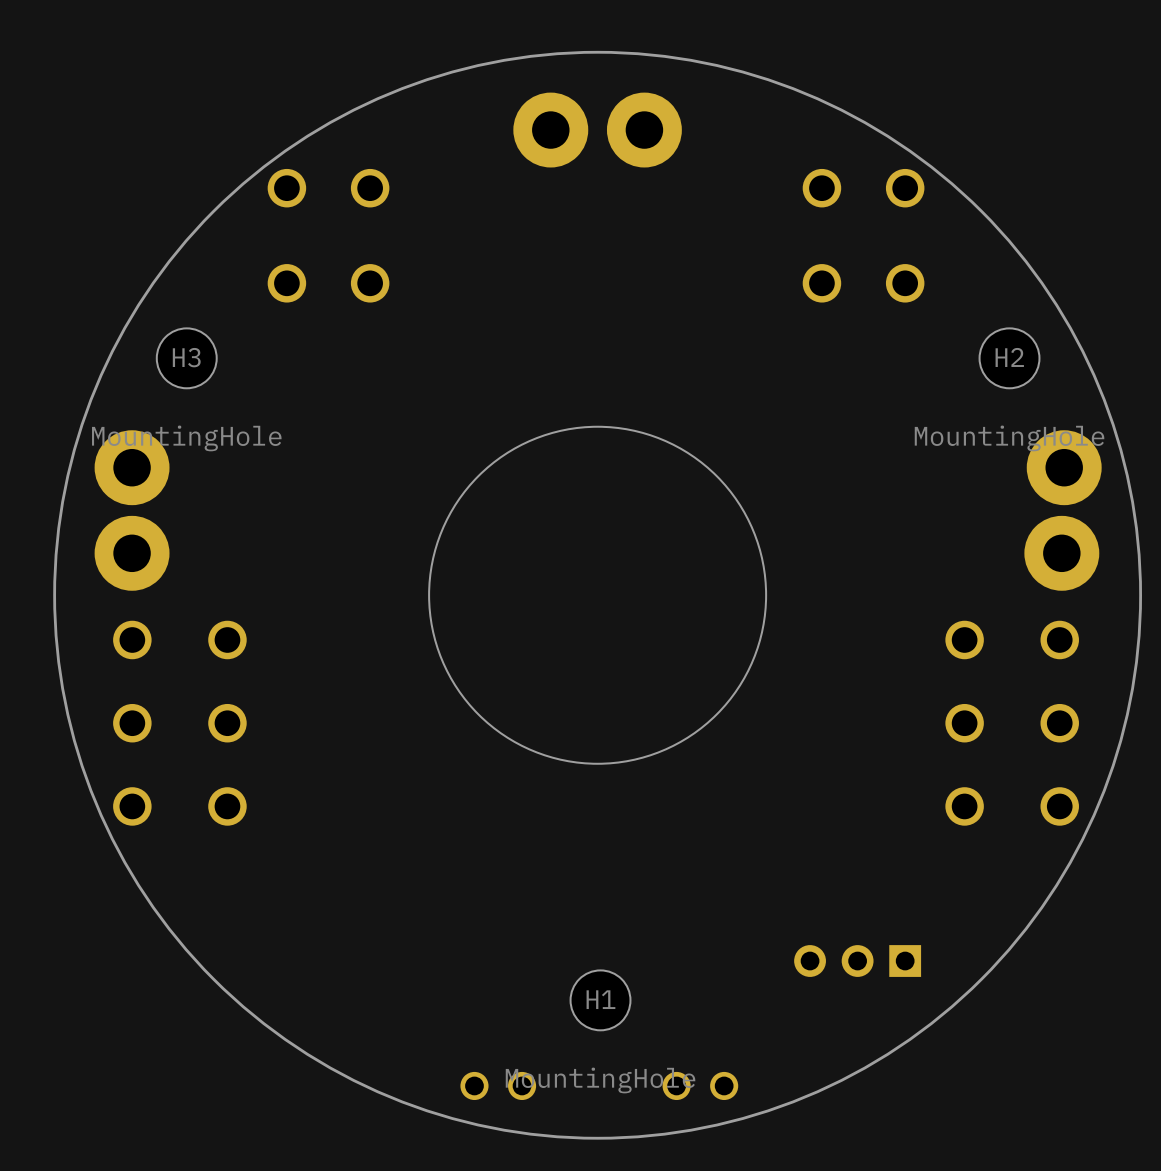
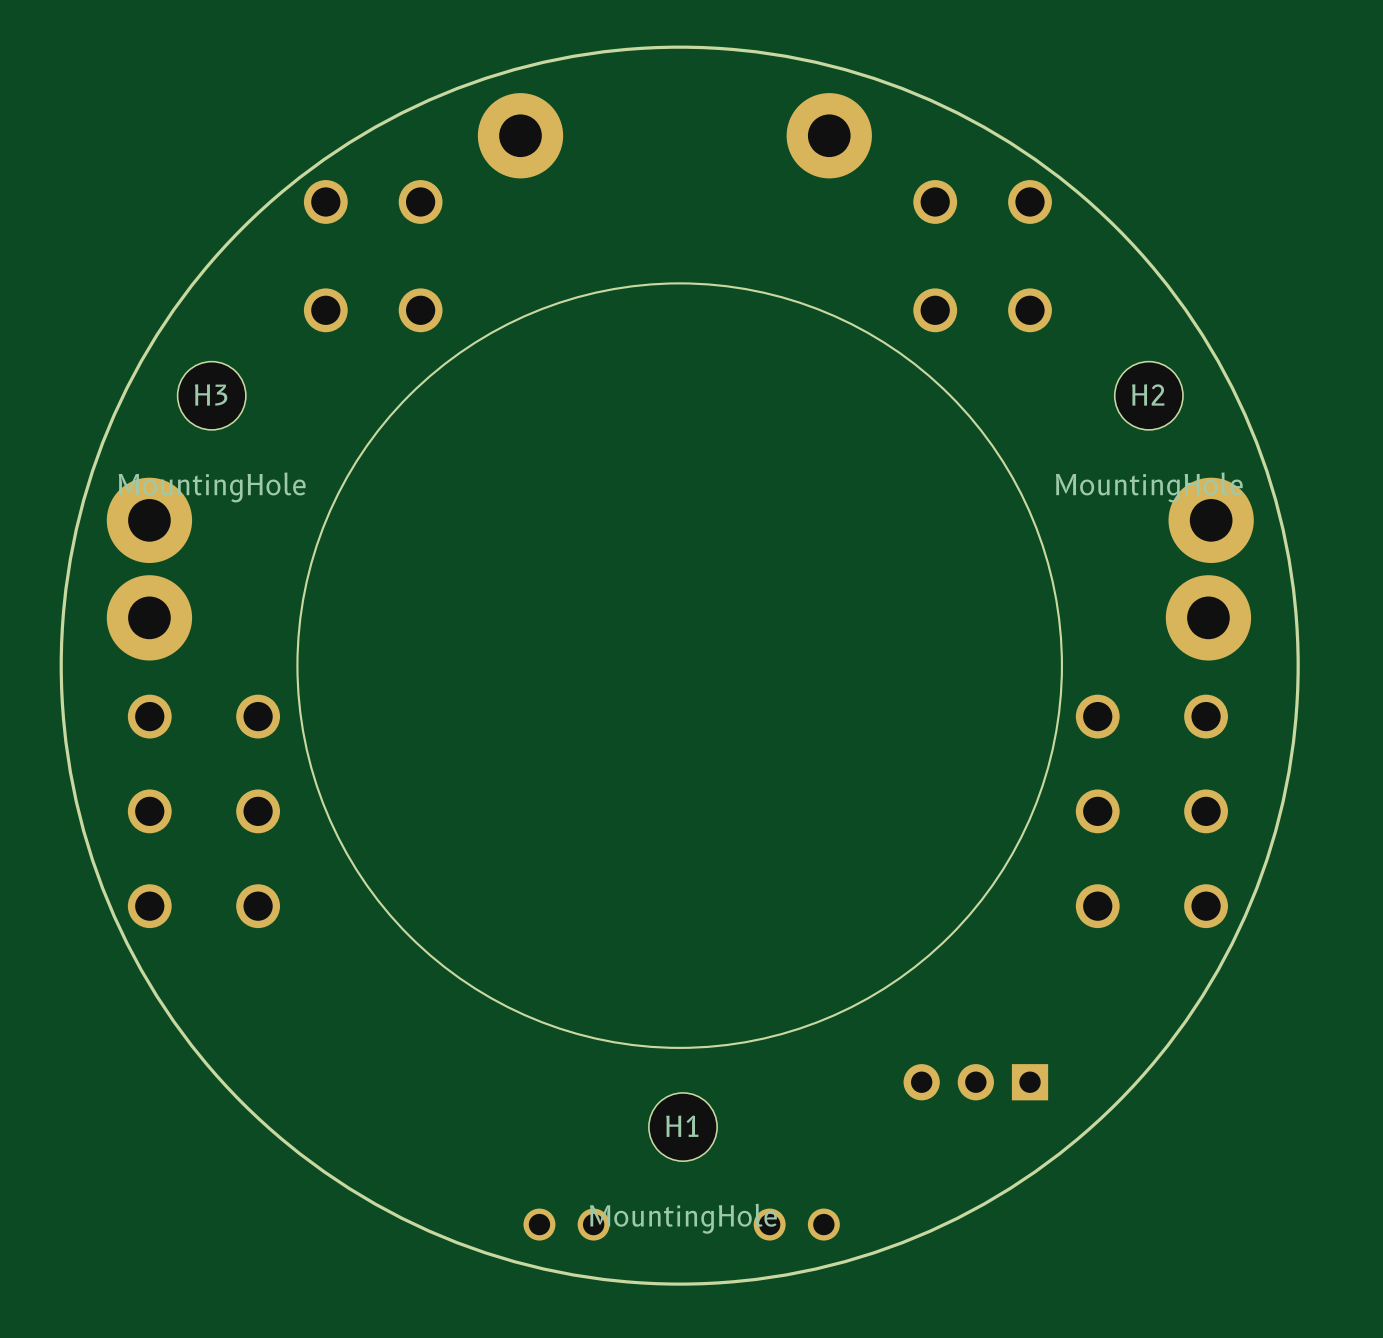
part: none -> (520, 135)
part: (550, 130) -> none
part position: (644, 130) -> (829, 135)
round board edge size: [428, 425, 768, 765] -> [296, 282, 1064, 1049]

